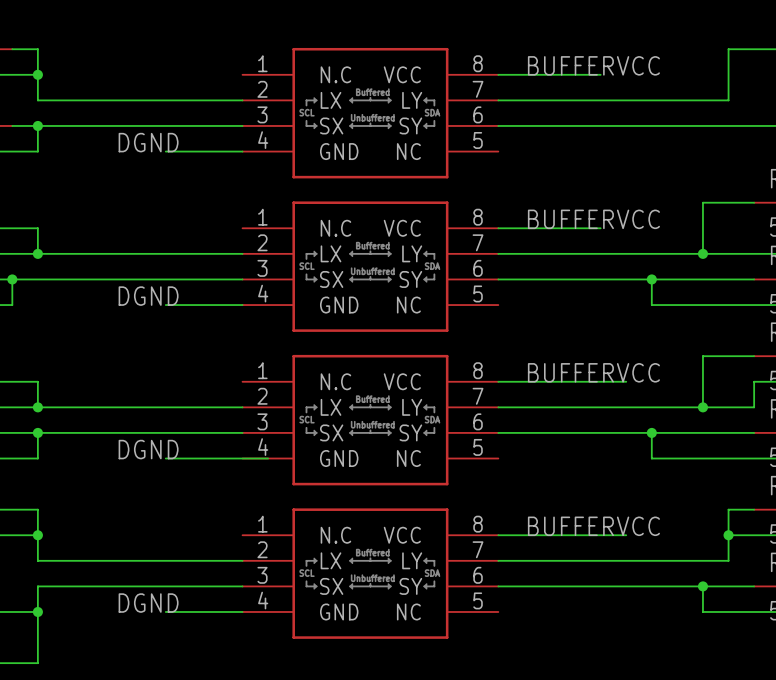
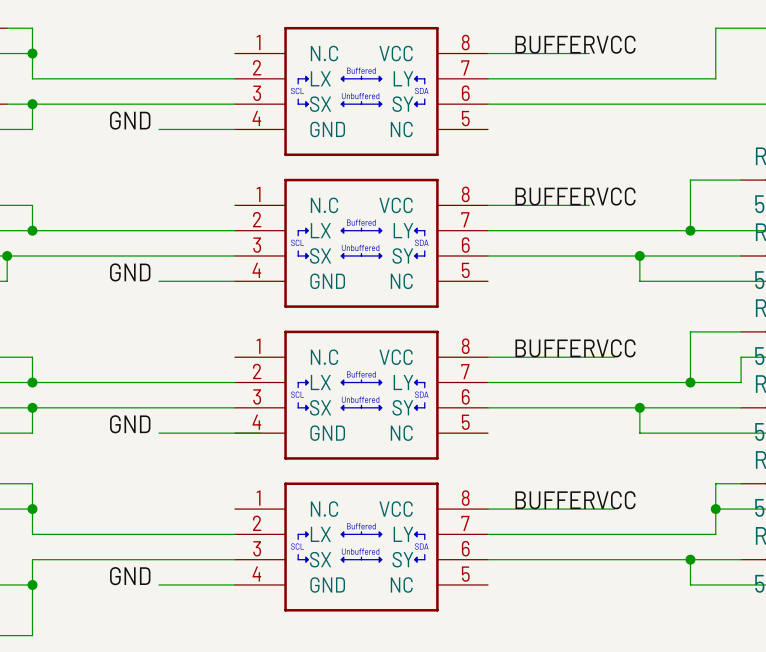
label: DGND (148, 142) -> GND (130, 120)
label: DGND (148, 296) -> GND (130, 272)
label: DGND (148, 449) -> GND (130, 424)
label: DGND (148, 603) -> GND (130, 576)

